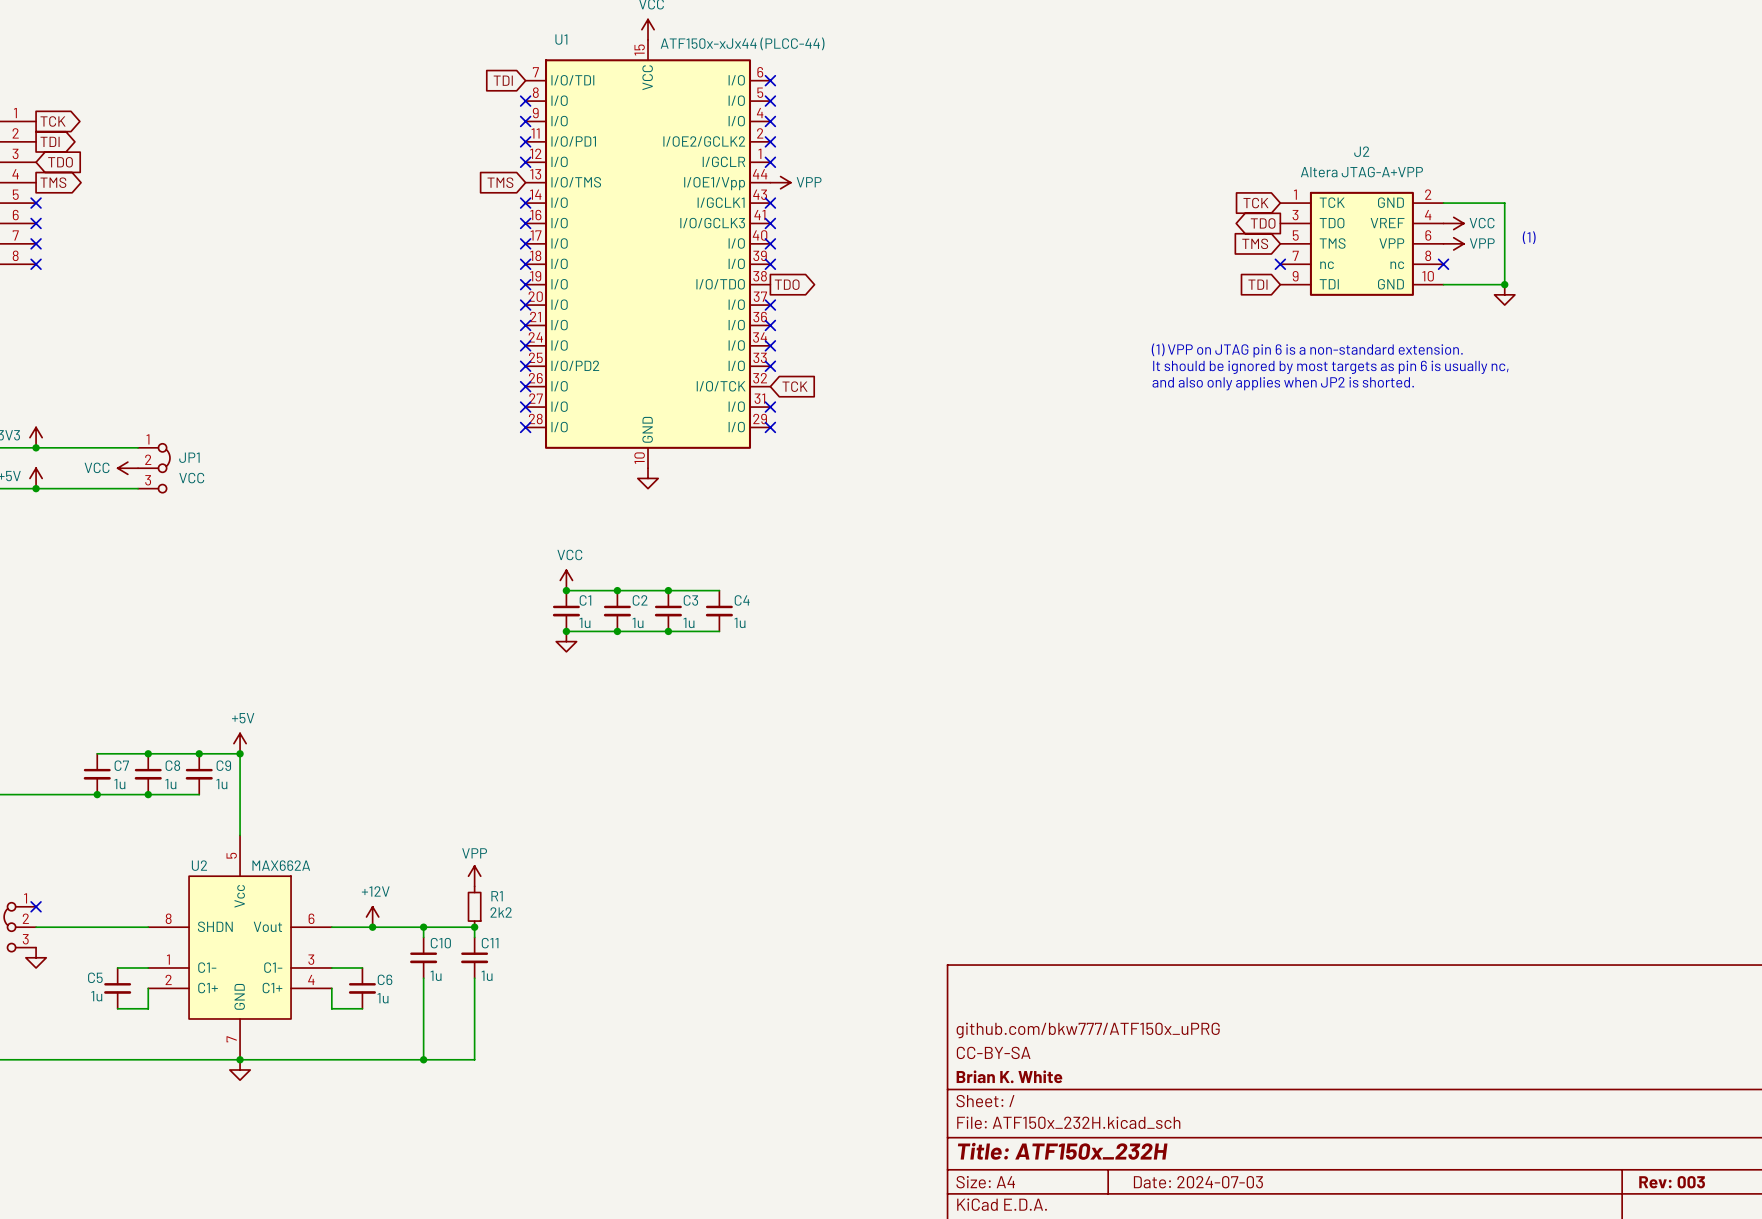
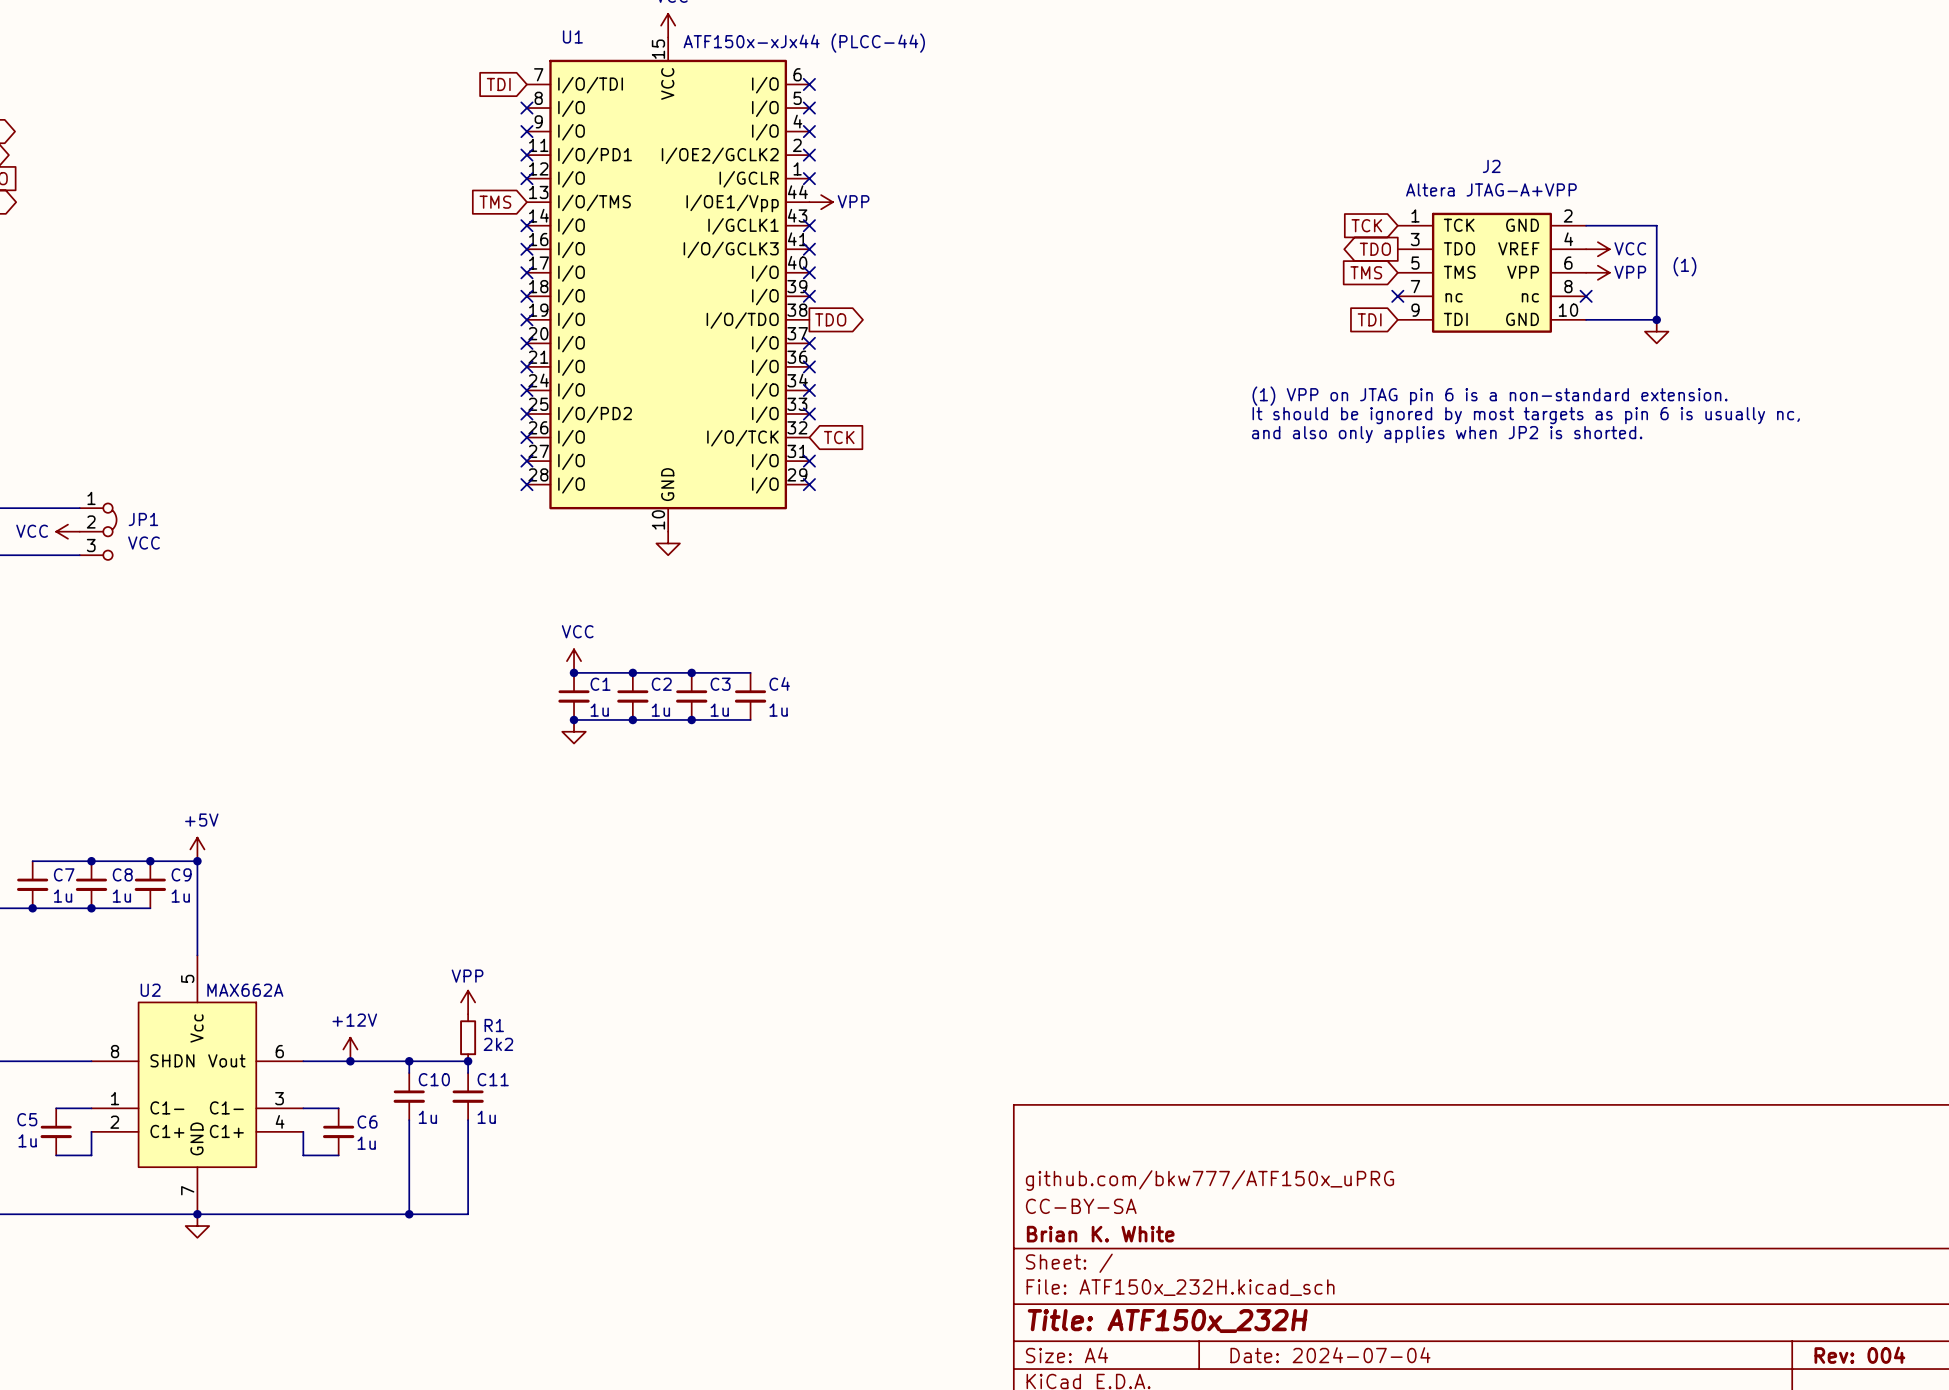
title block: Date: 2024-07-03 (1198, 1182) -> Date: 2024-07-04 (1330, 1355)
title block: Rev: 003 (1672, 1182) -> Rev: 004 (1859, 1355)

